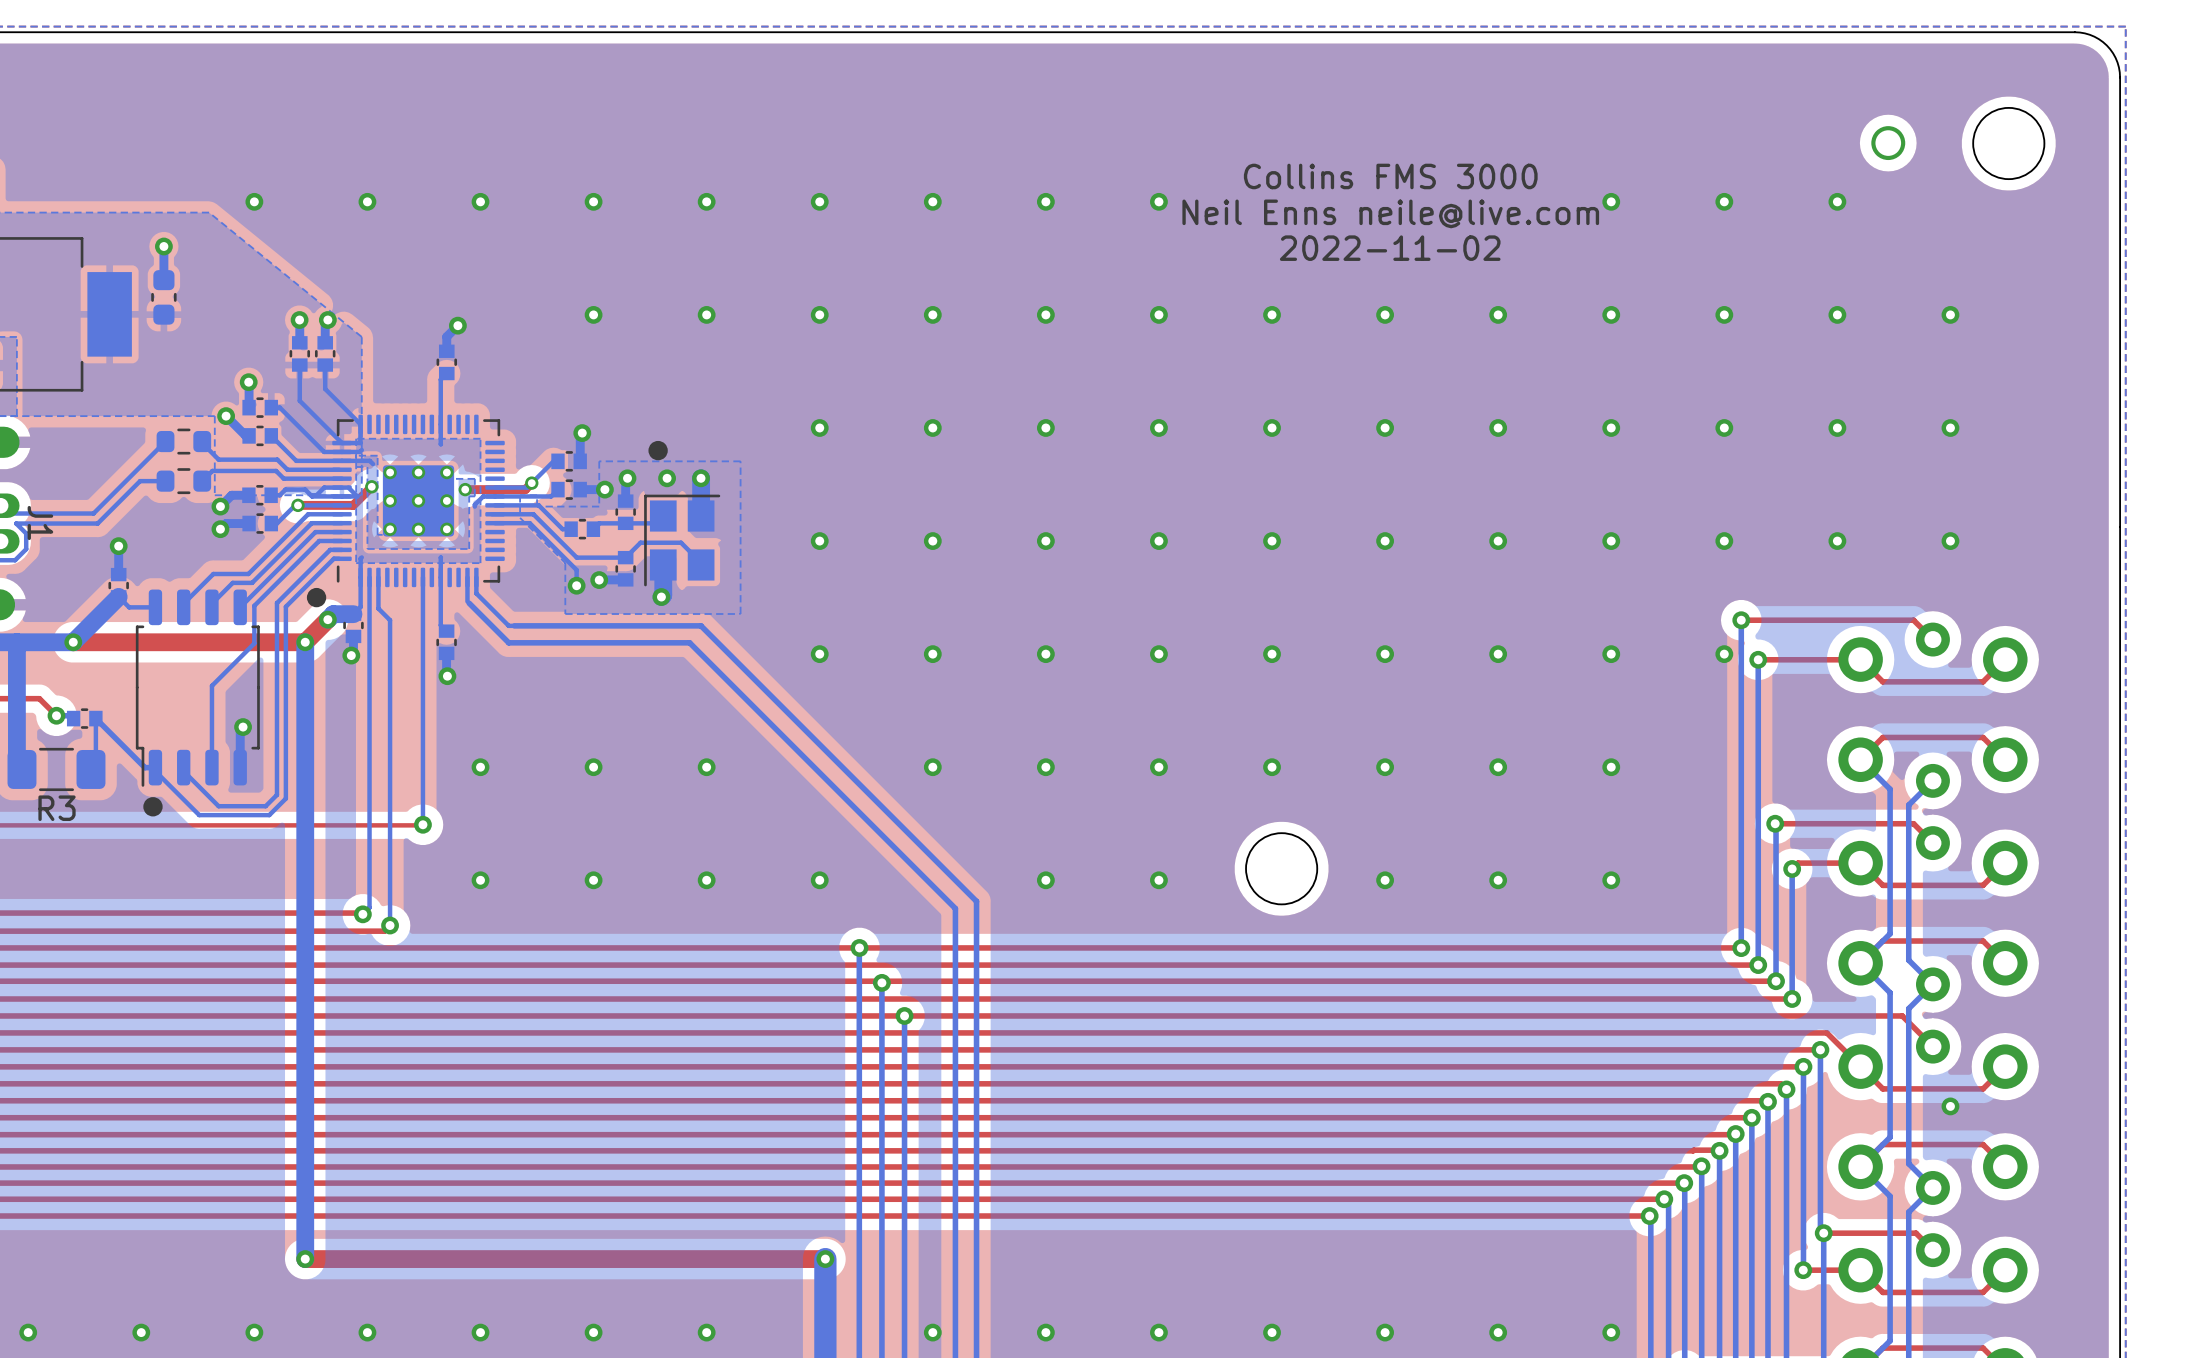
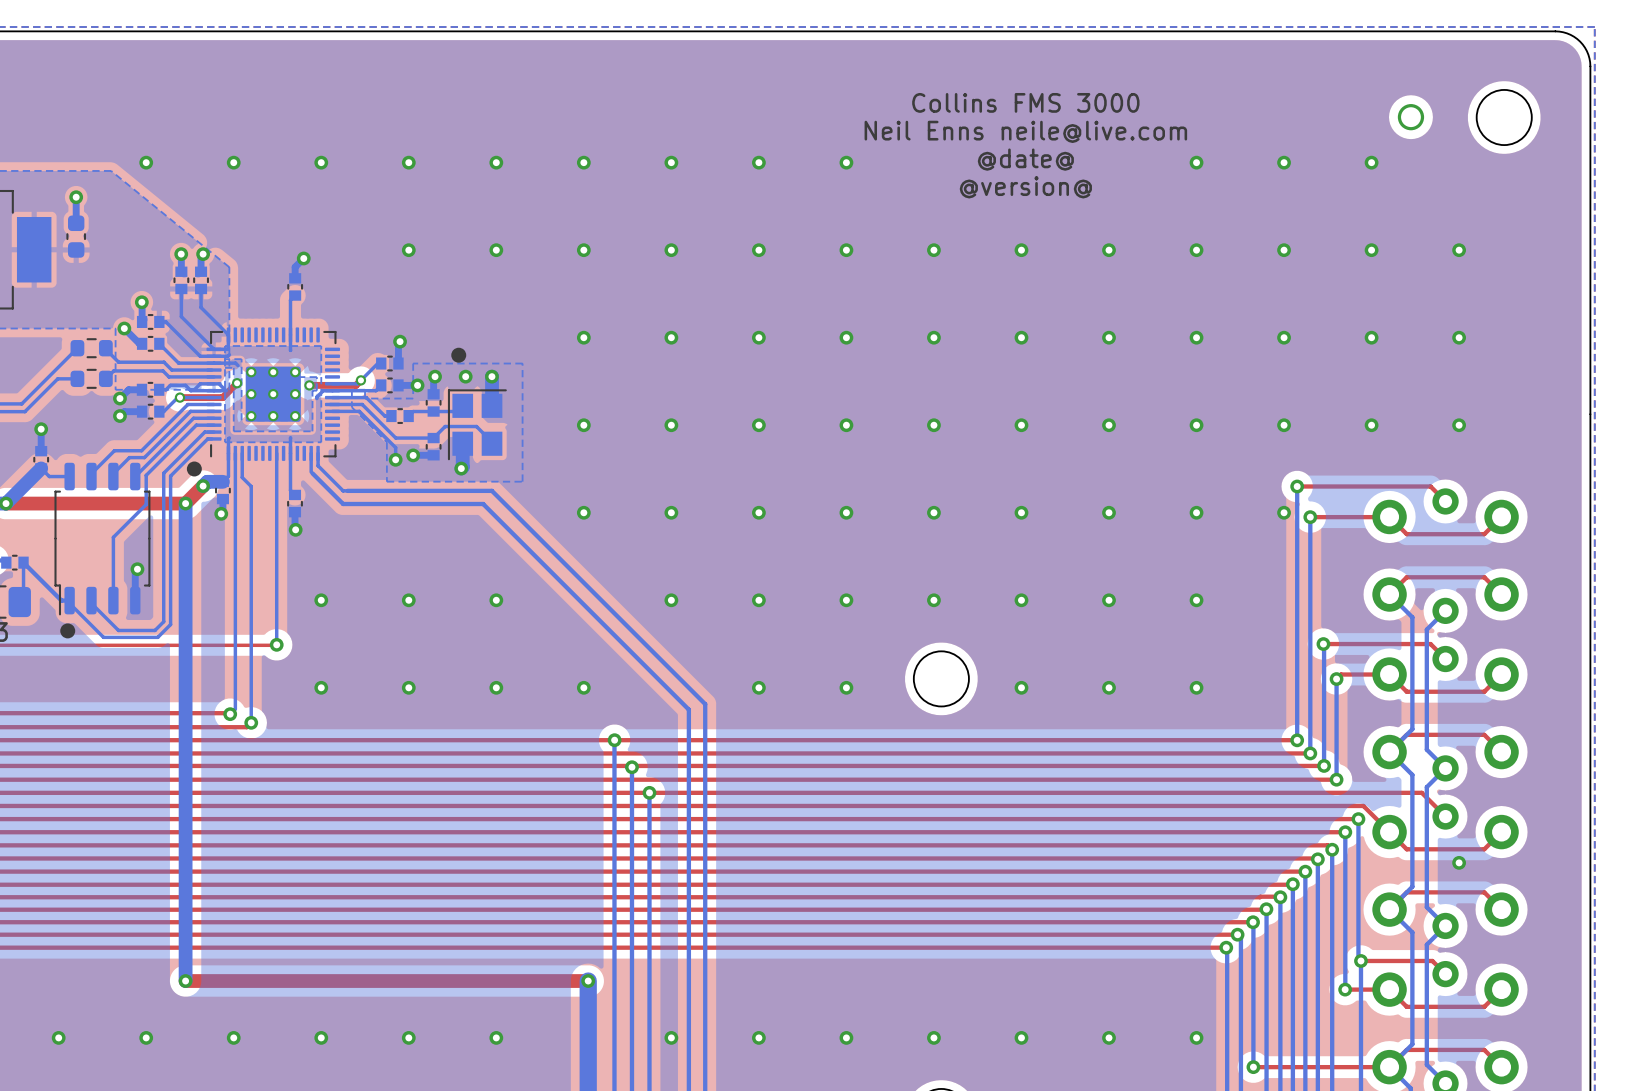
text position: Collins FMS 3000 (1390, 176) -> Collins FMS 3000 (1025, 102)
text: none -> @date@ (1025, 159)
text position: Neil Enns neile@live.com (1390, 213) -> Neil Enns neile@live.com (1025, 131)
text: none -> @version@ (1025, 187)
text: 2022-11-02 (1390, 248) -> none

